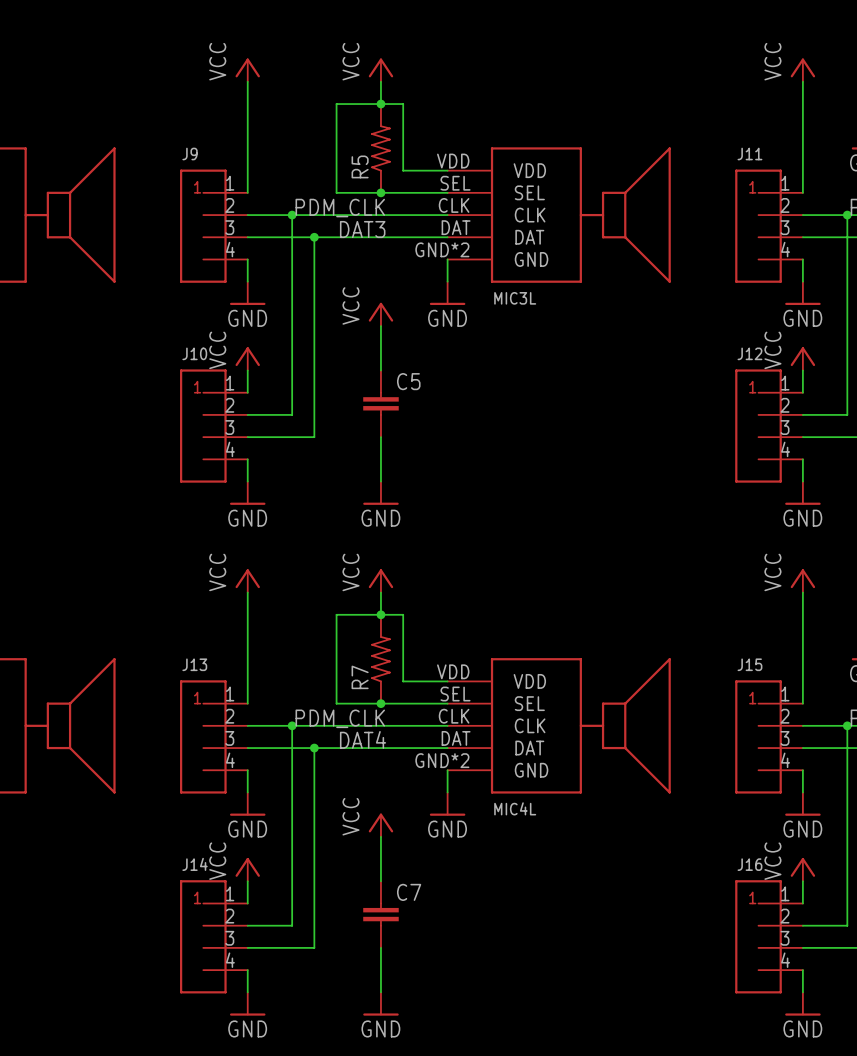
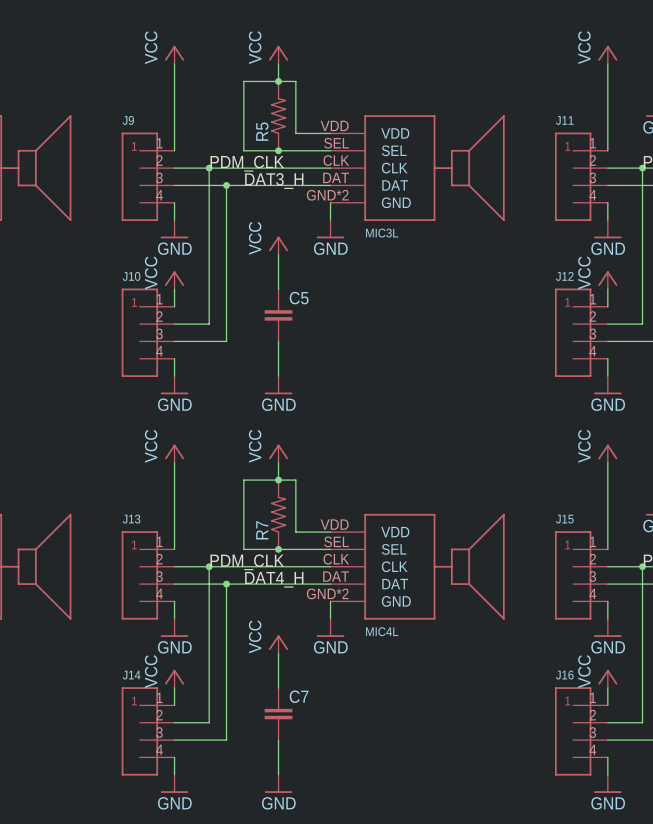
label: DAT3 (362, 229) -> DAT3_H (274, 181)
label: DAT4 (363, 739) -> DAT4_H (274, 579)

